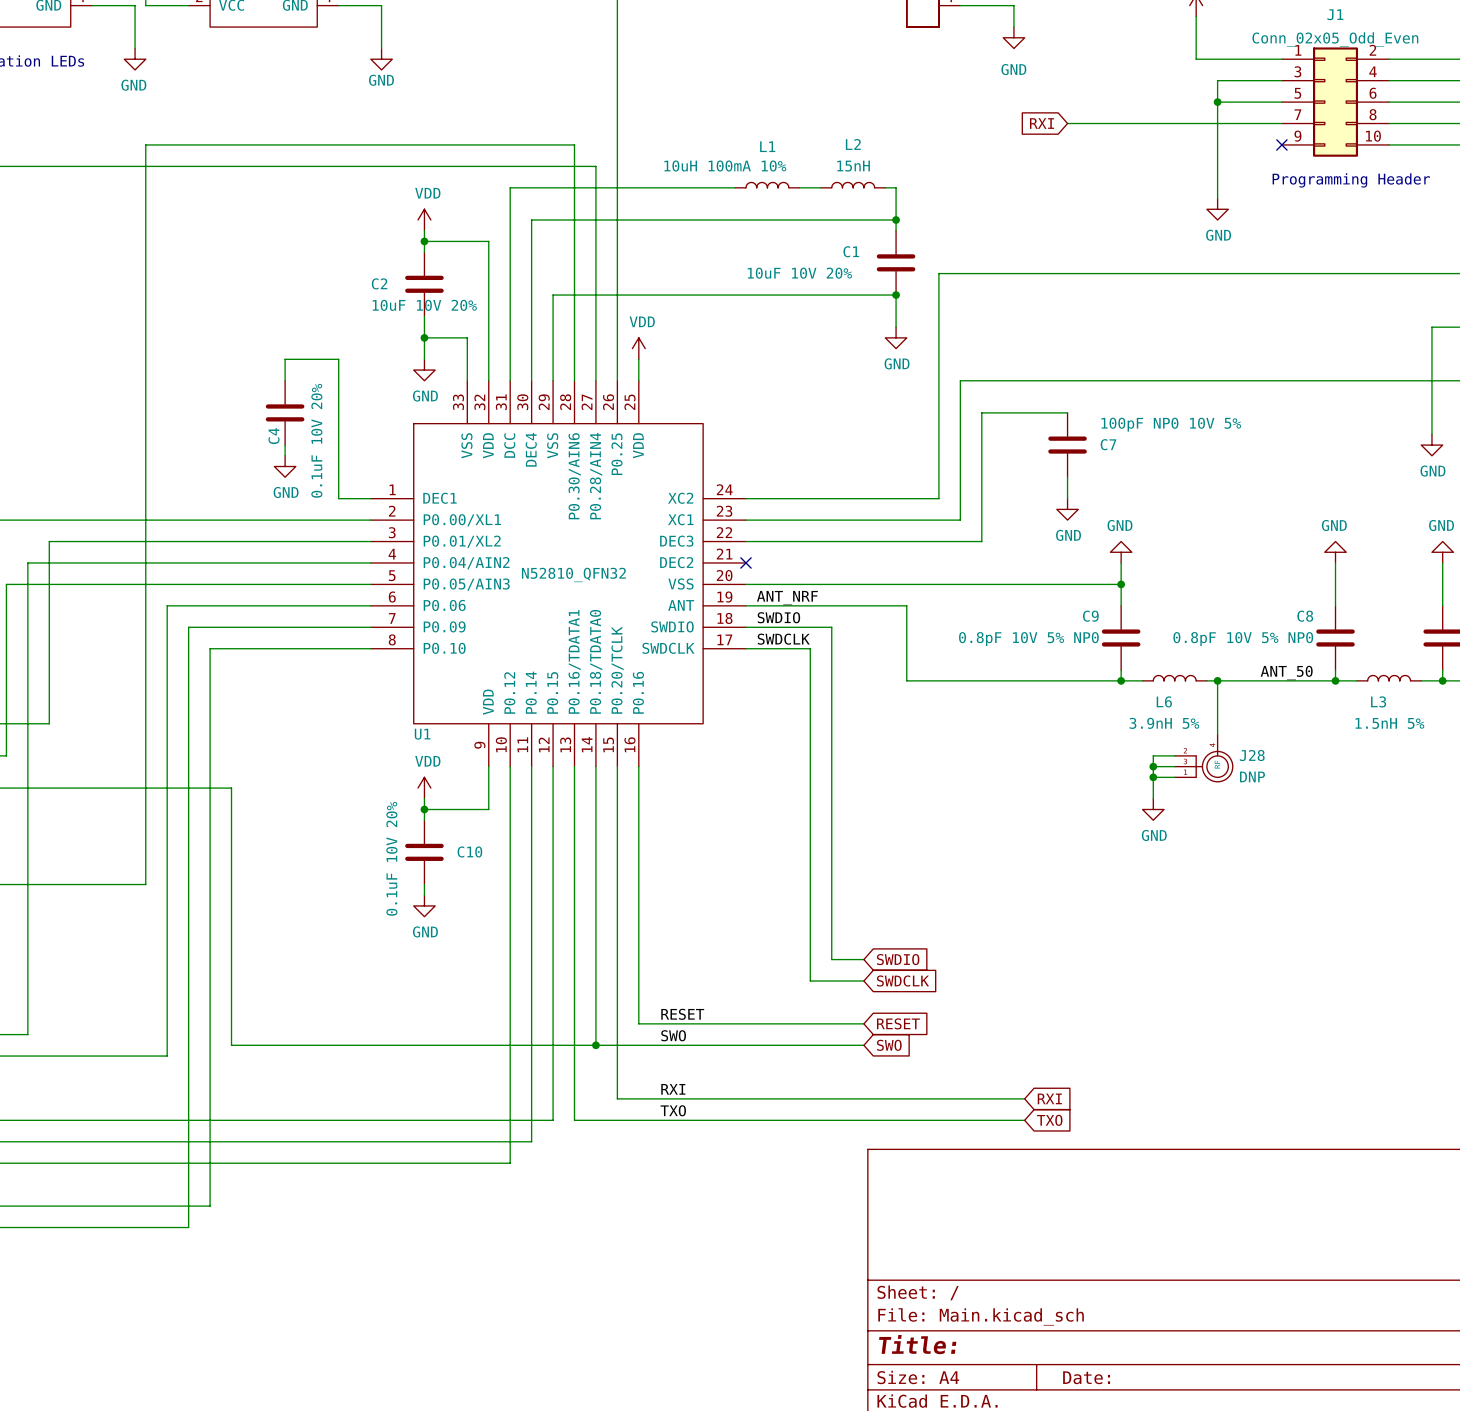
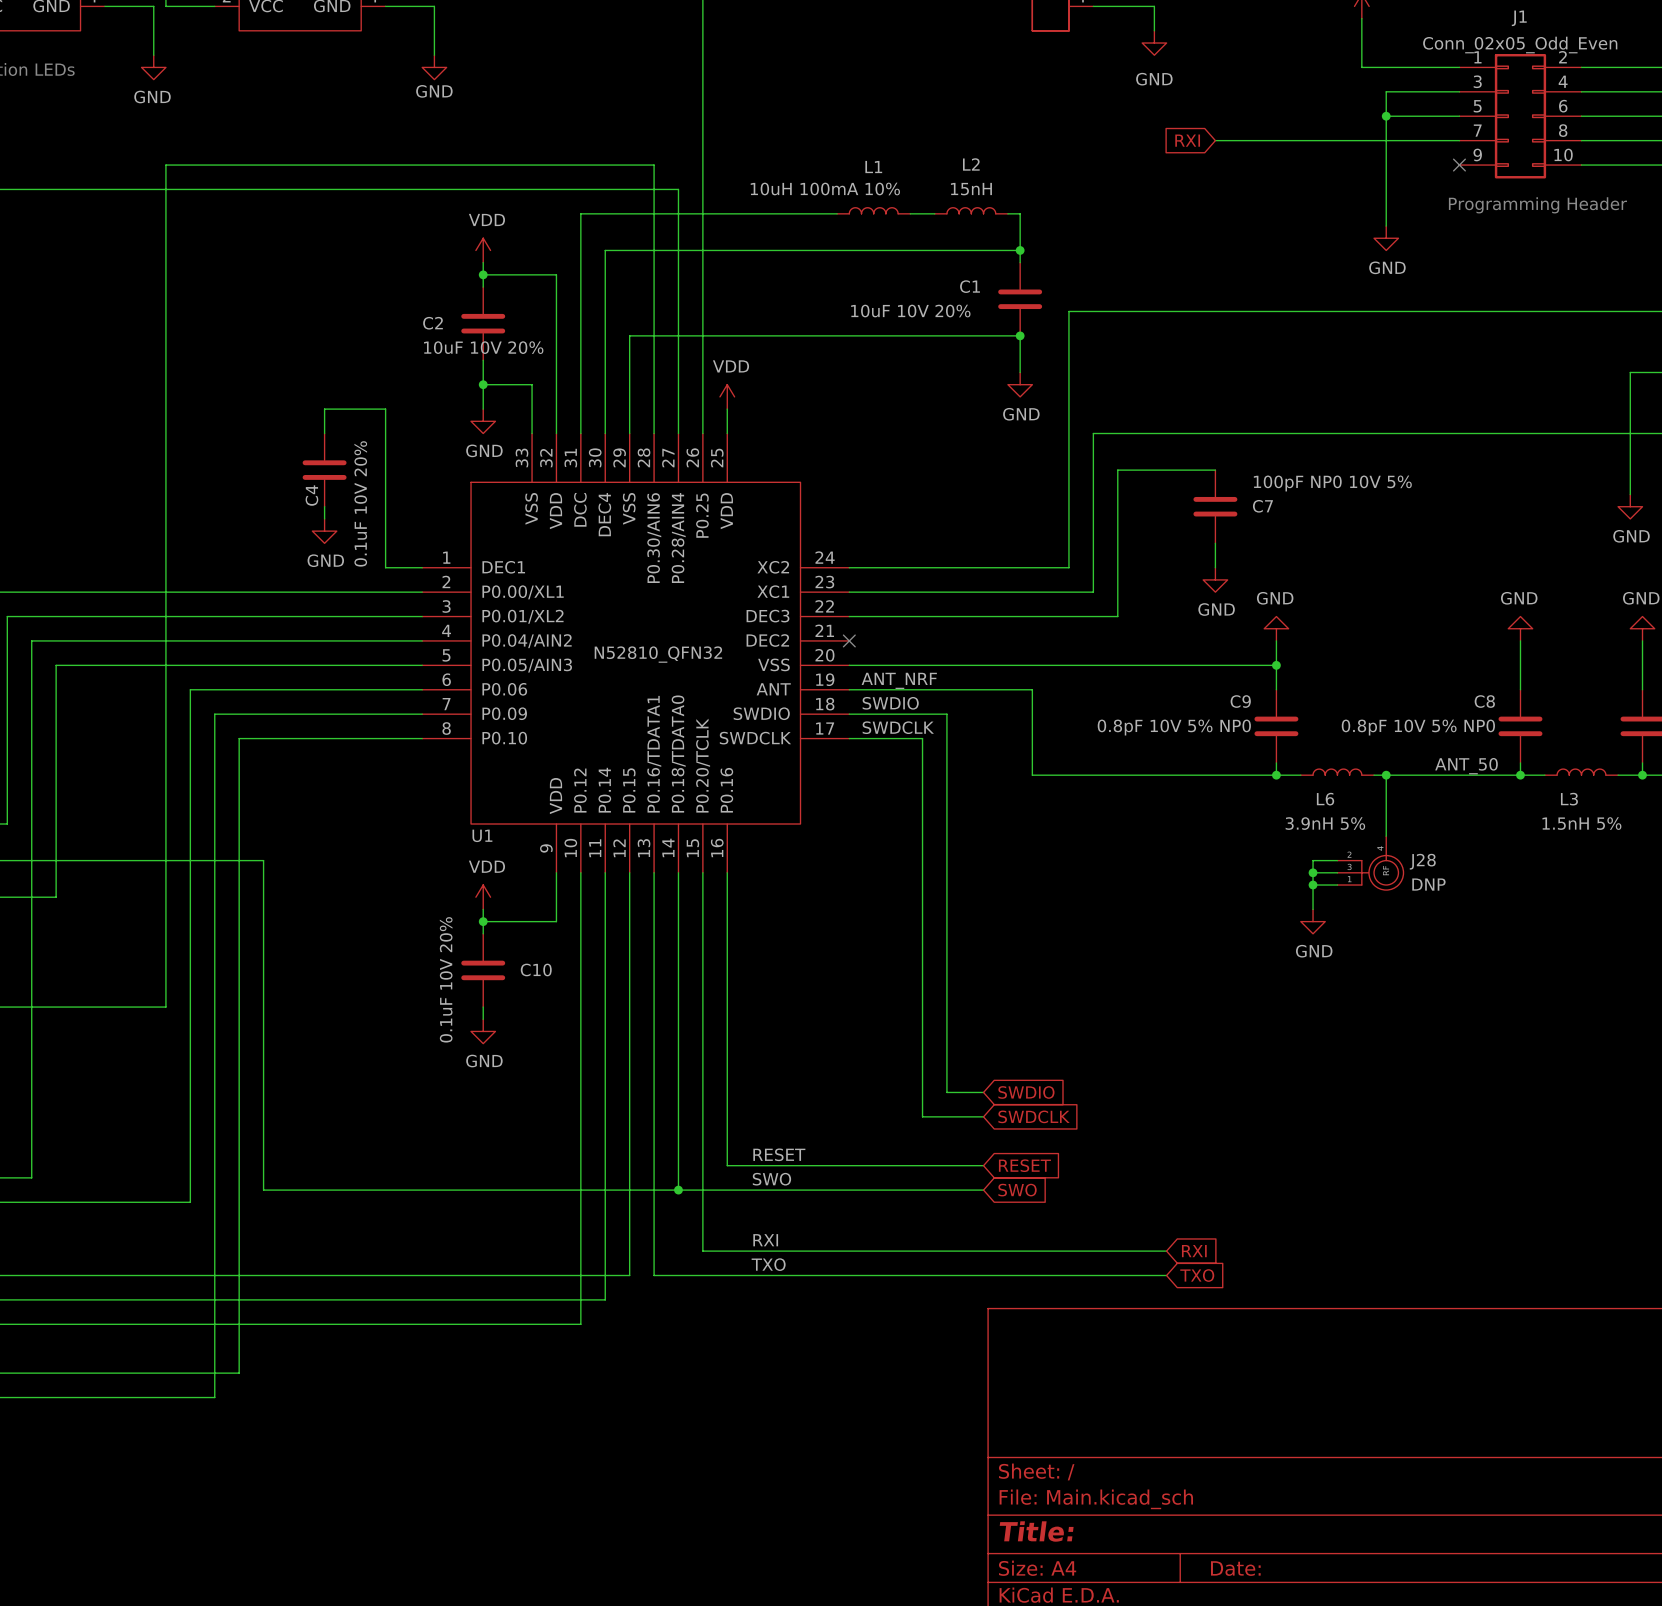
wire: (49, 541) (49, 584) (6, 584) -> (56, 616) (7, 616) (7, 665)
wire: (49, 723) (6, 723) (6, 755) -> (56, 824) (56, 897)
wire: (49, 788) (231, 788) -> (7, 860) (263, 860) (263, 897)

